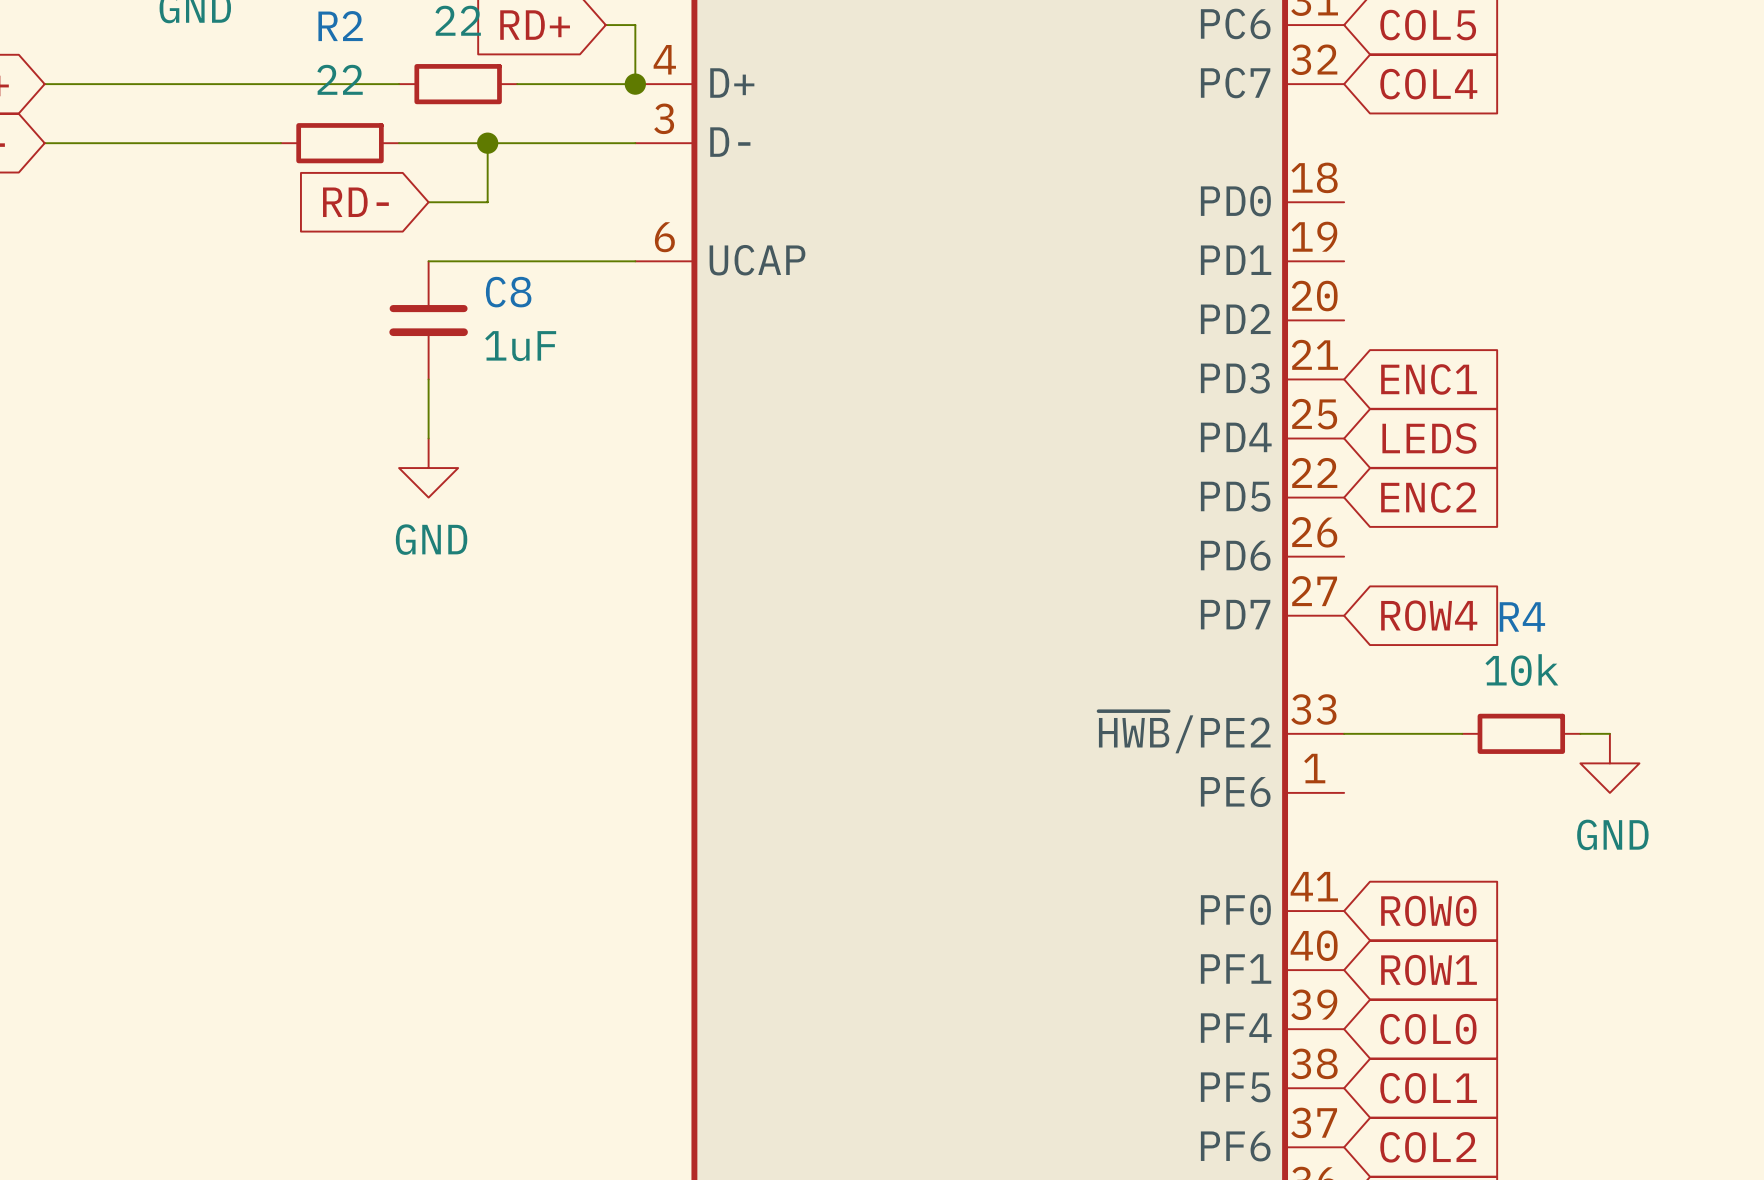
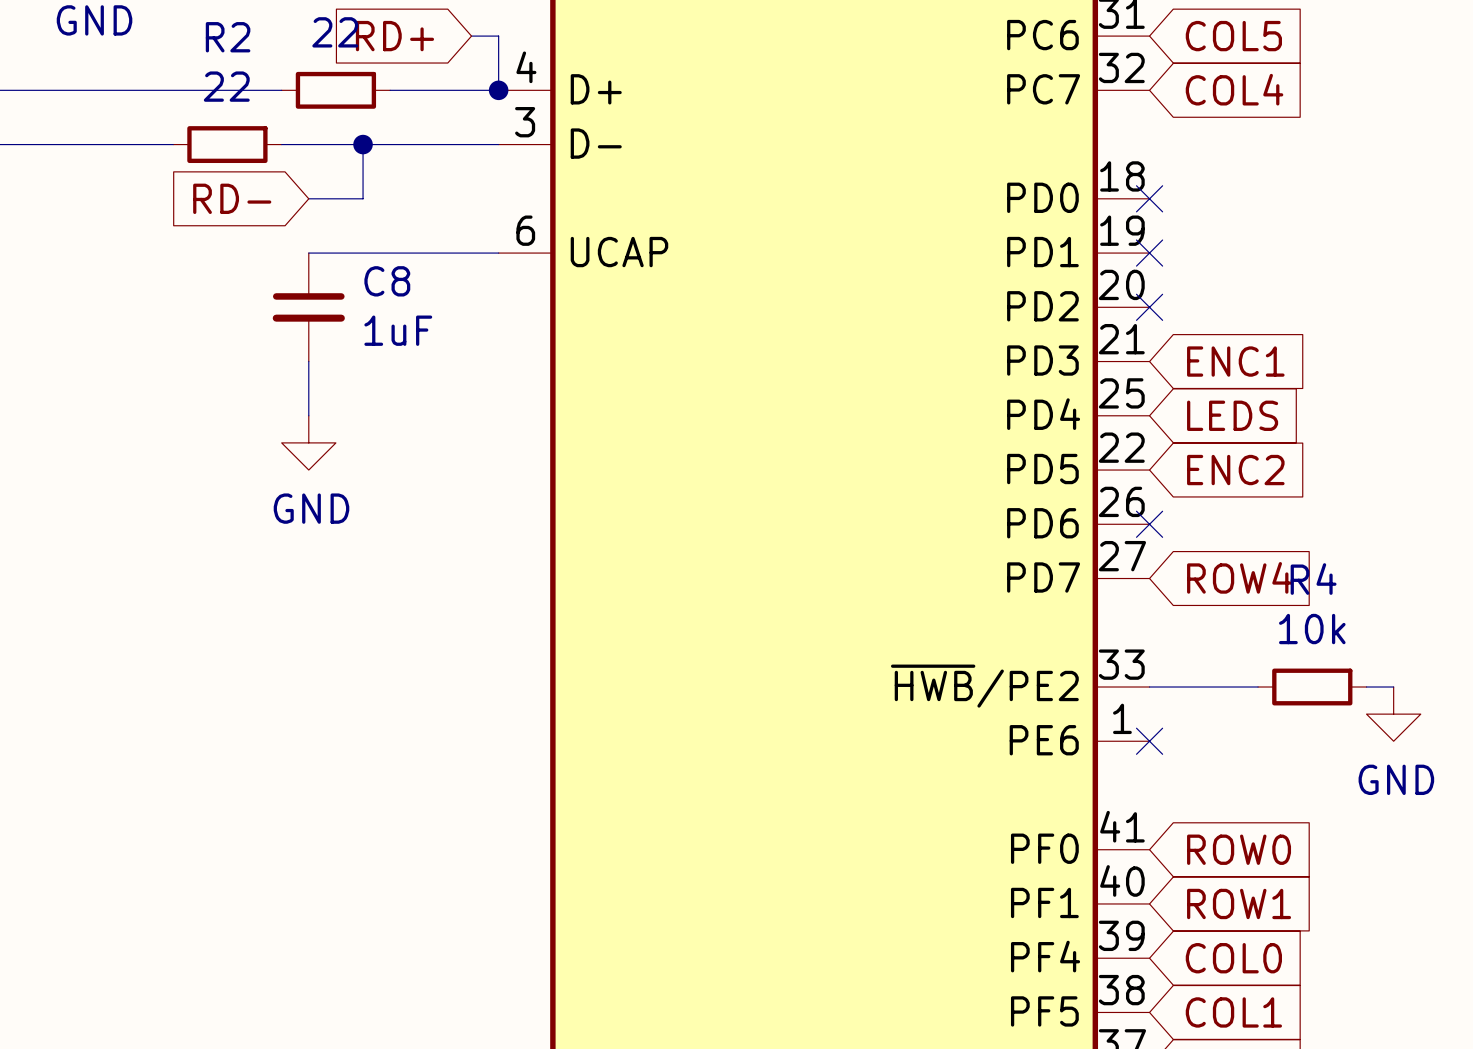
no-connect mark: none -> (1149, 198)
no-connect mark: none -> (1149, 253)
no-connect mark: none -> (1149, 307)
no-connect mark: none -> (1149, 524)
no-connect mark: none -> (1149, 741)

